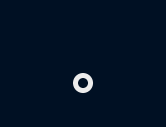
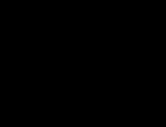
via: (83, 83) -> none

